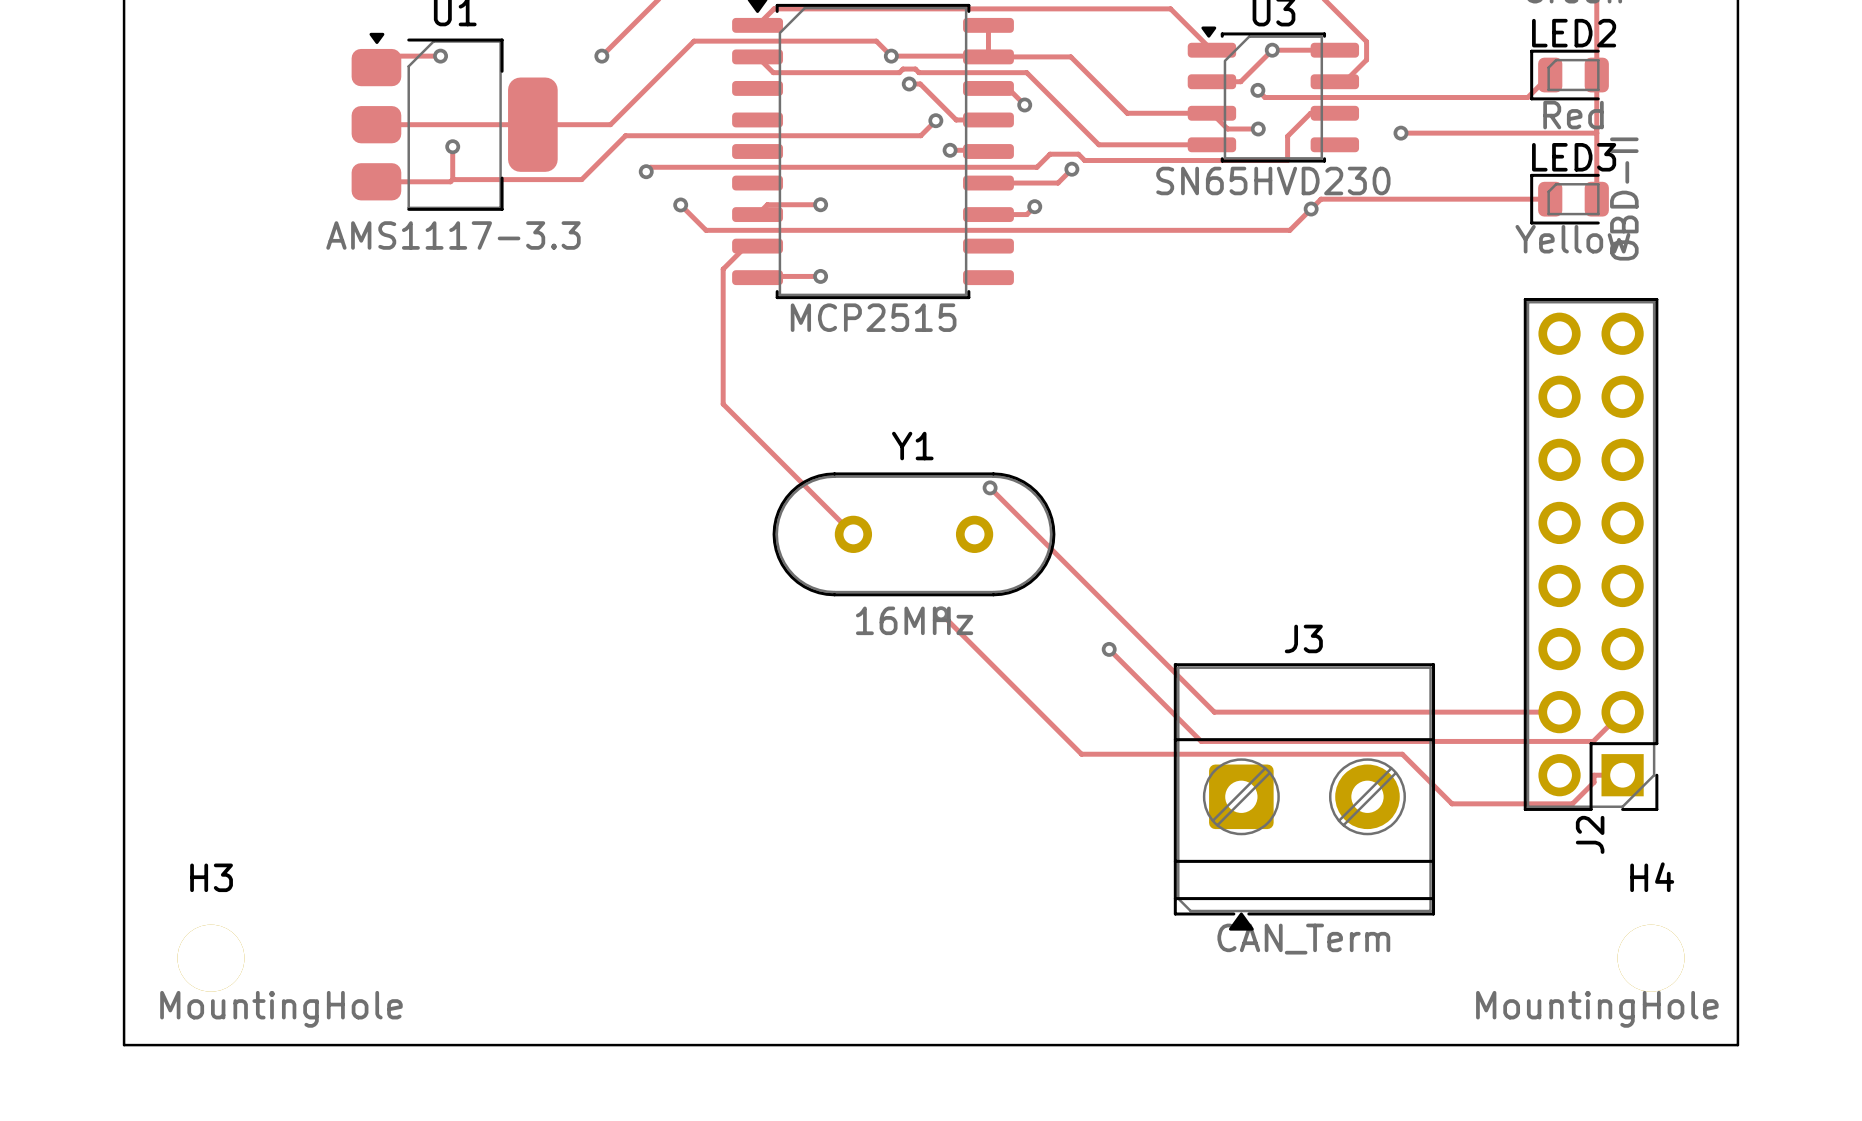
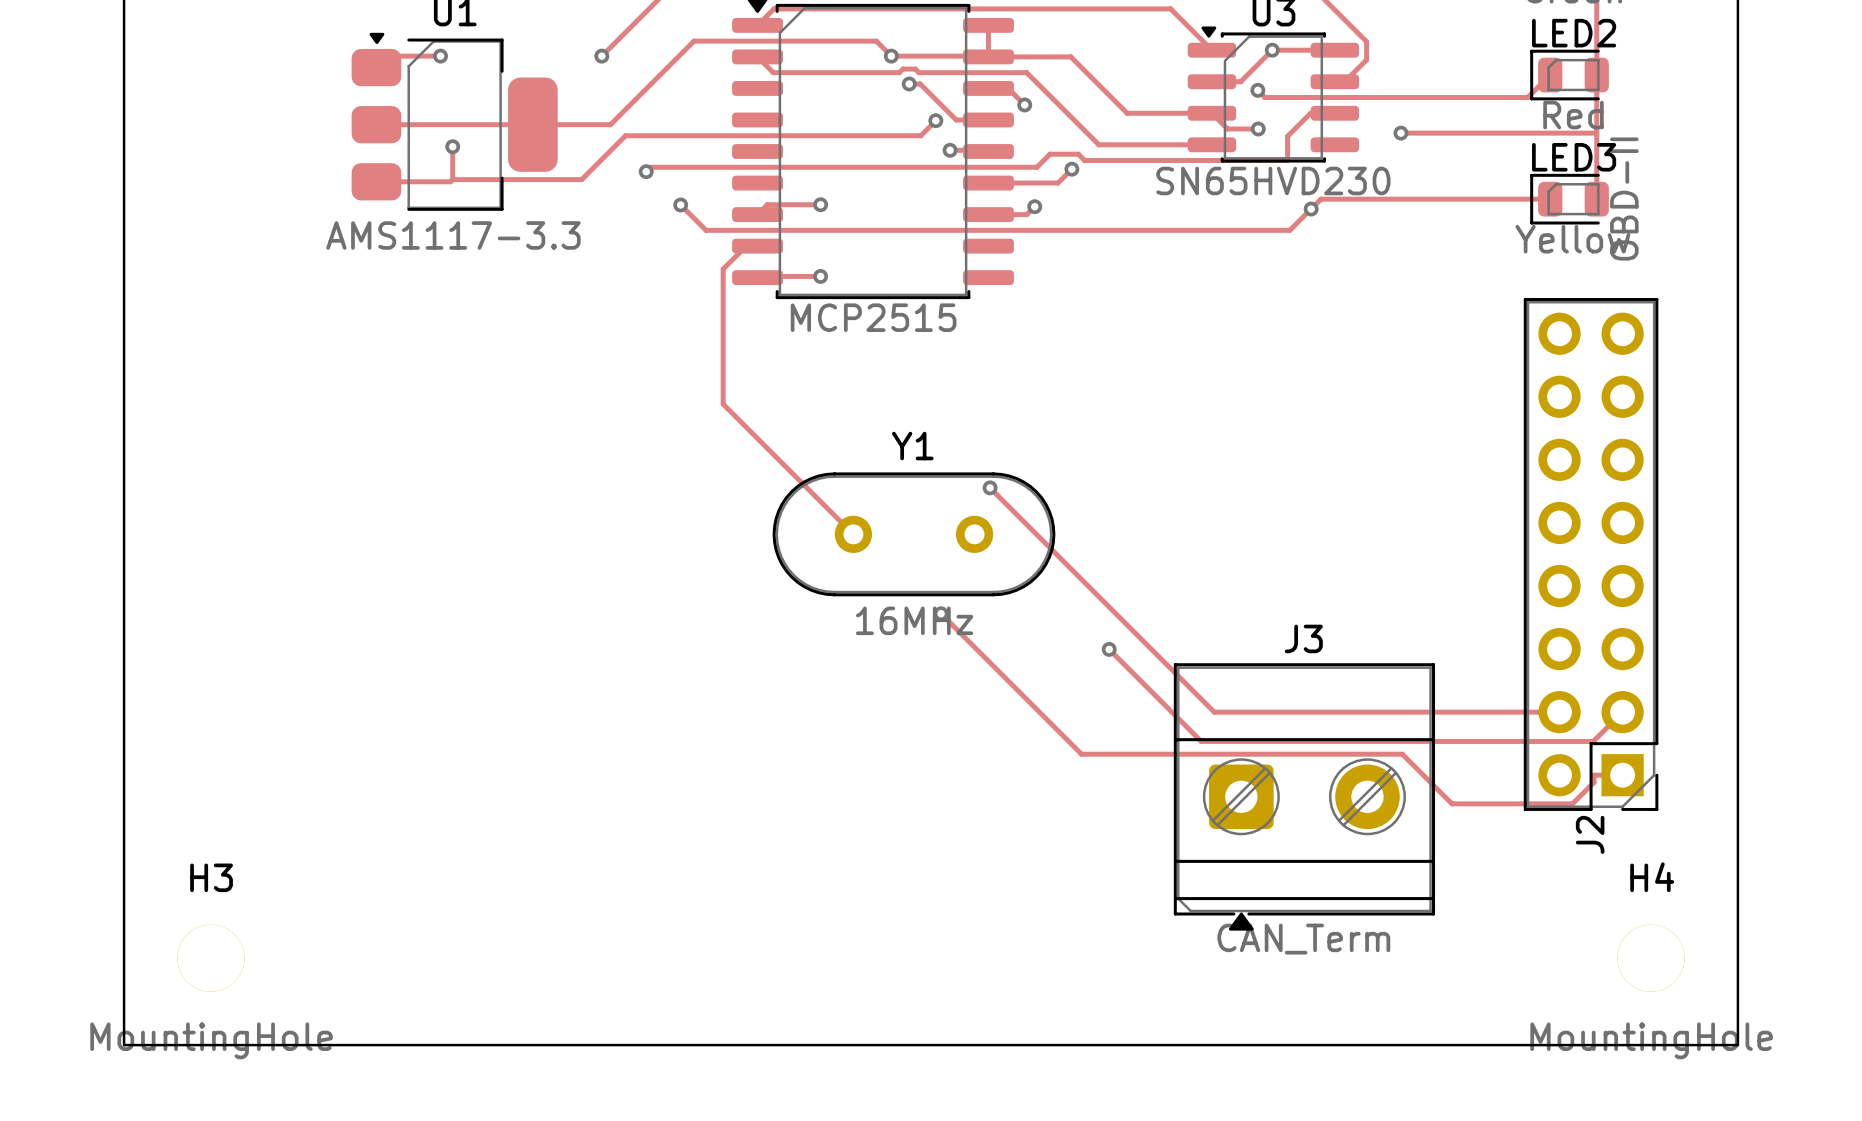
H3 value position: MountingHole (281, 1009) -> MountingHole (211, 1040)
H4 value position: MountingHole (1597, 1009) -> MountingHole (1651, 1040)

